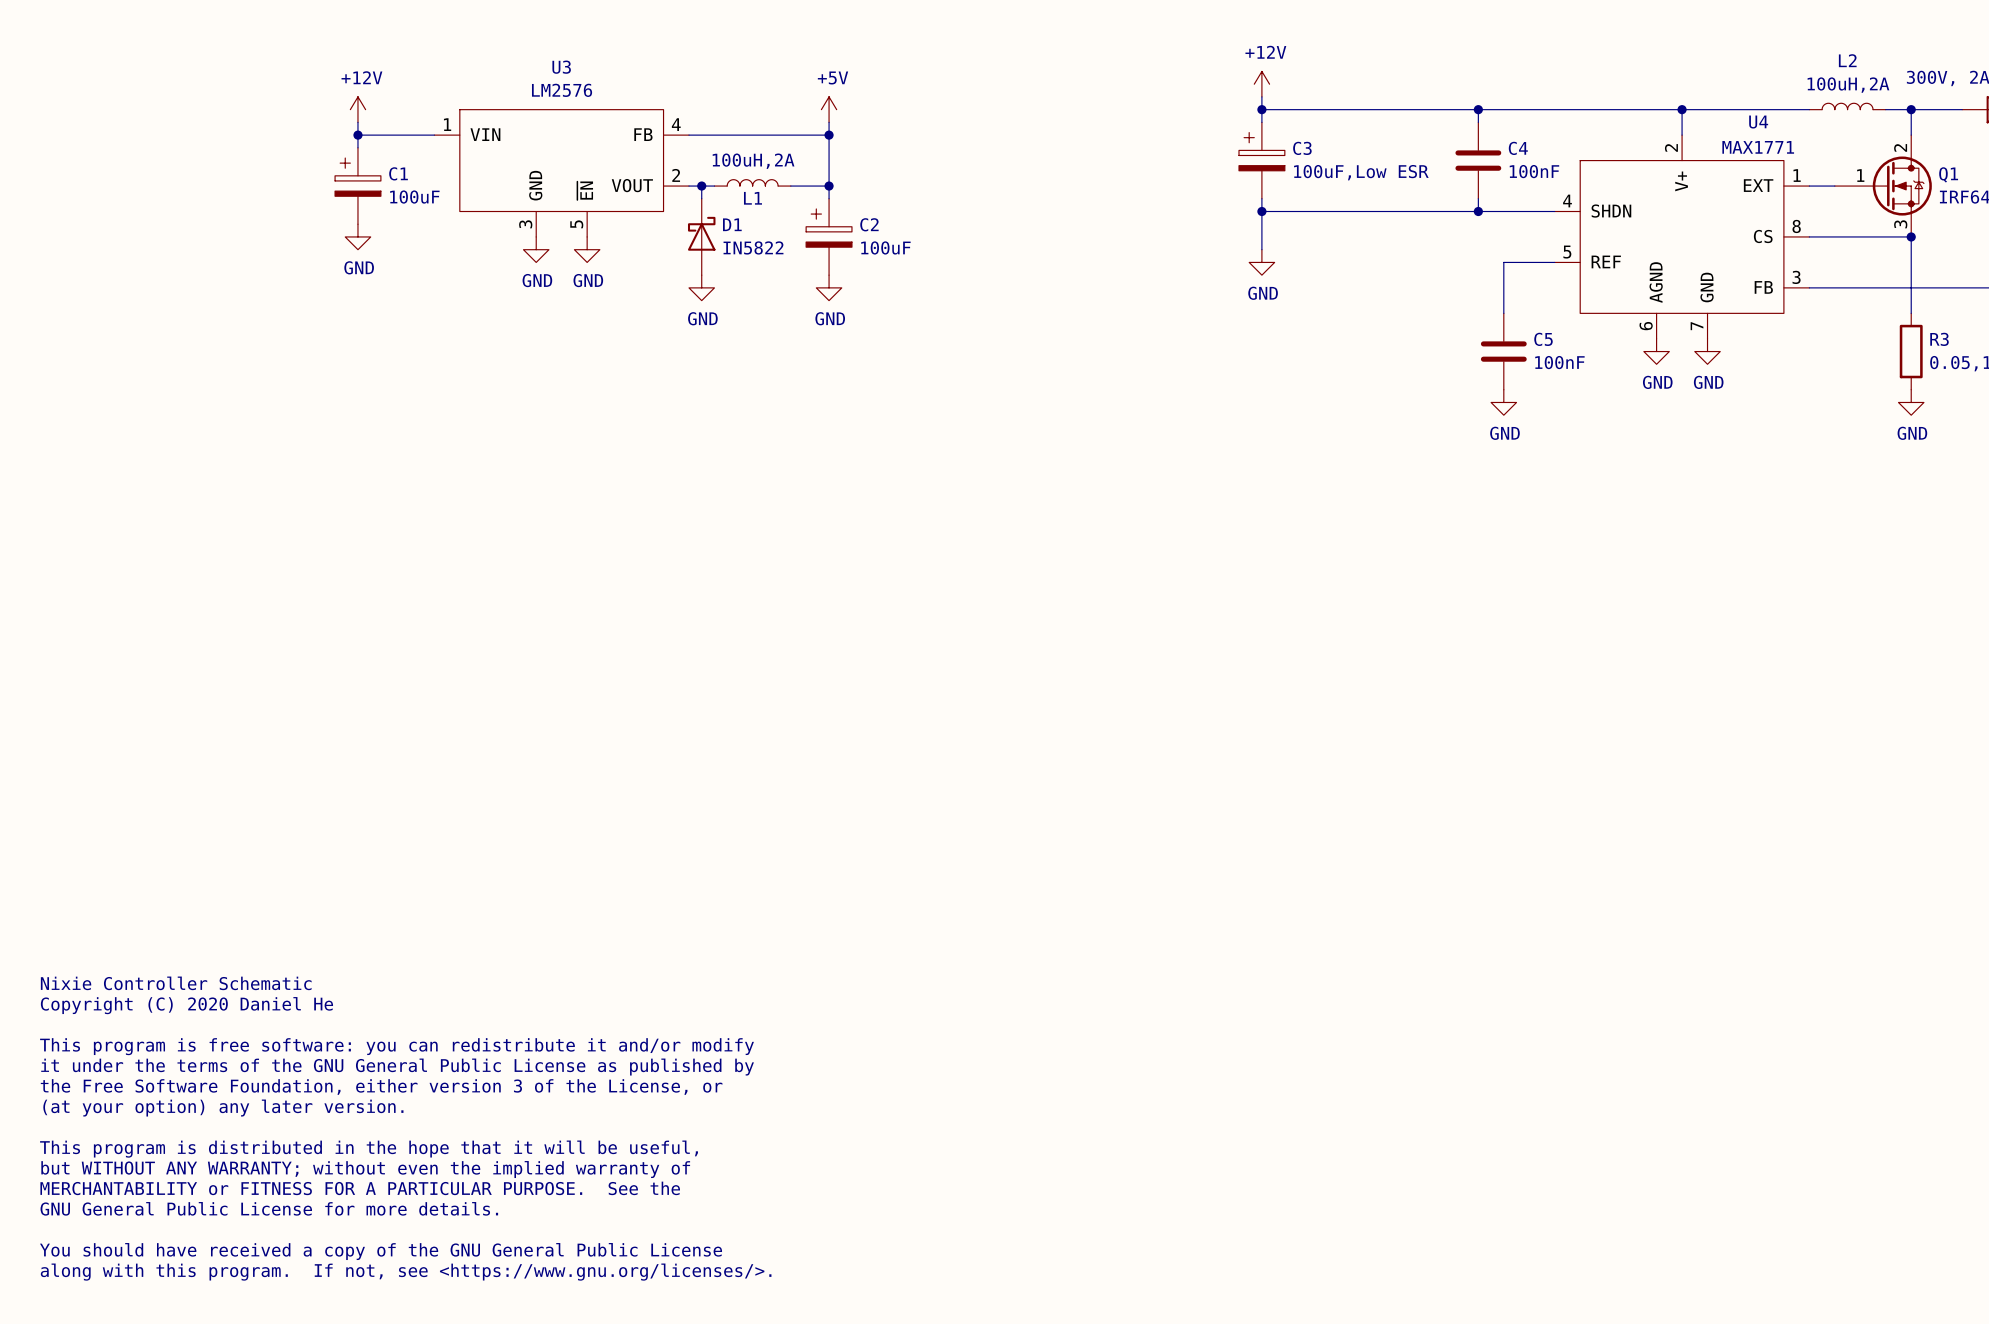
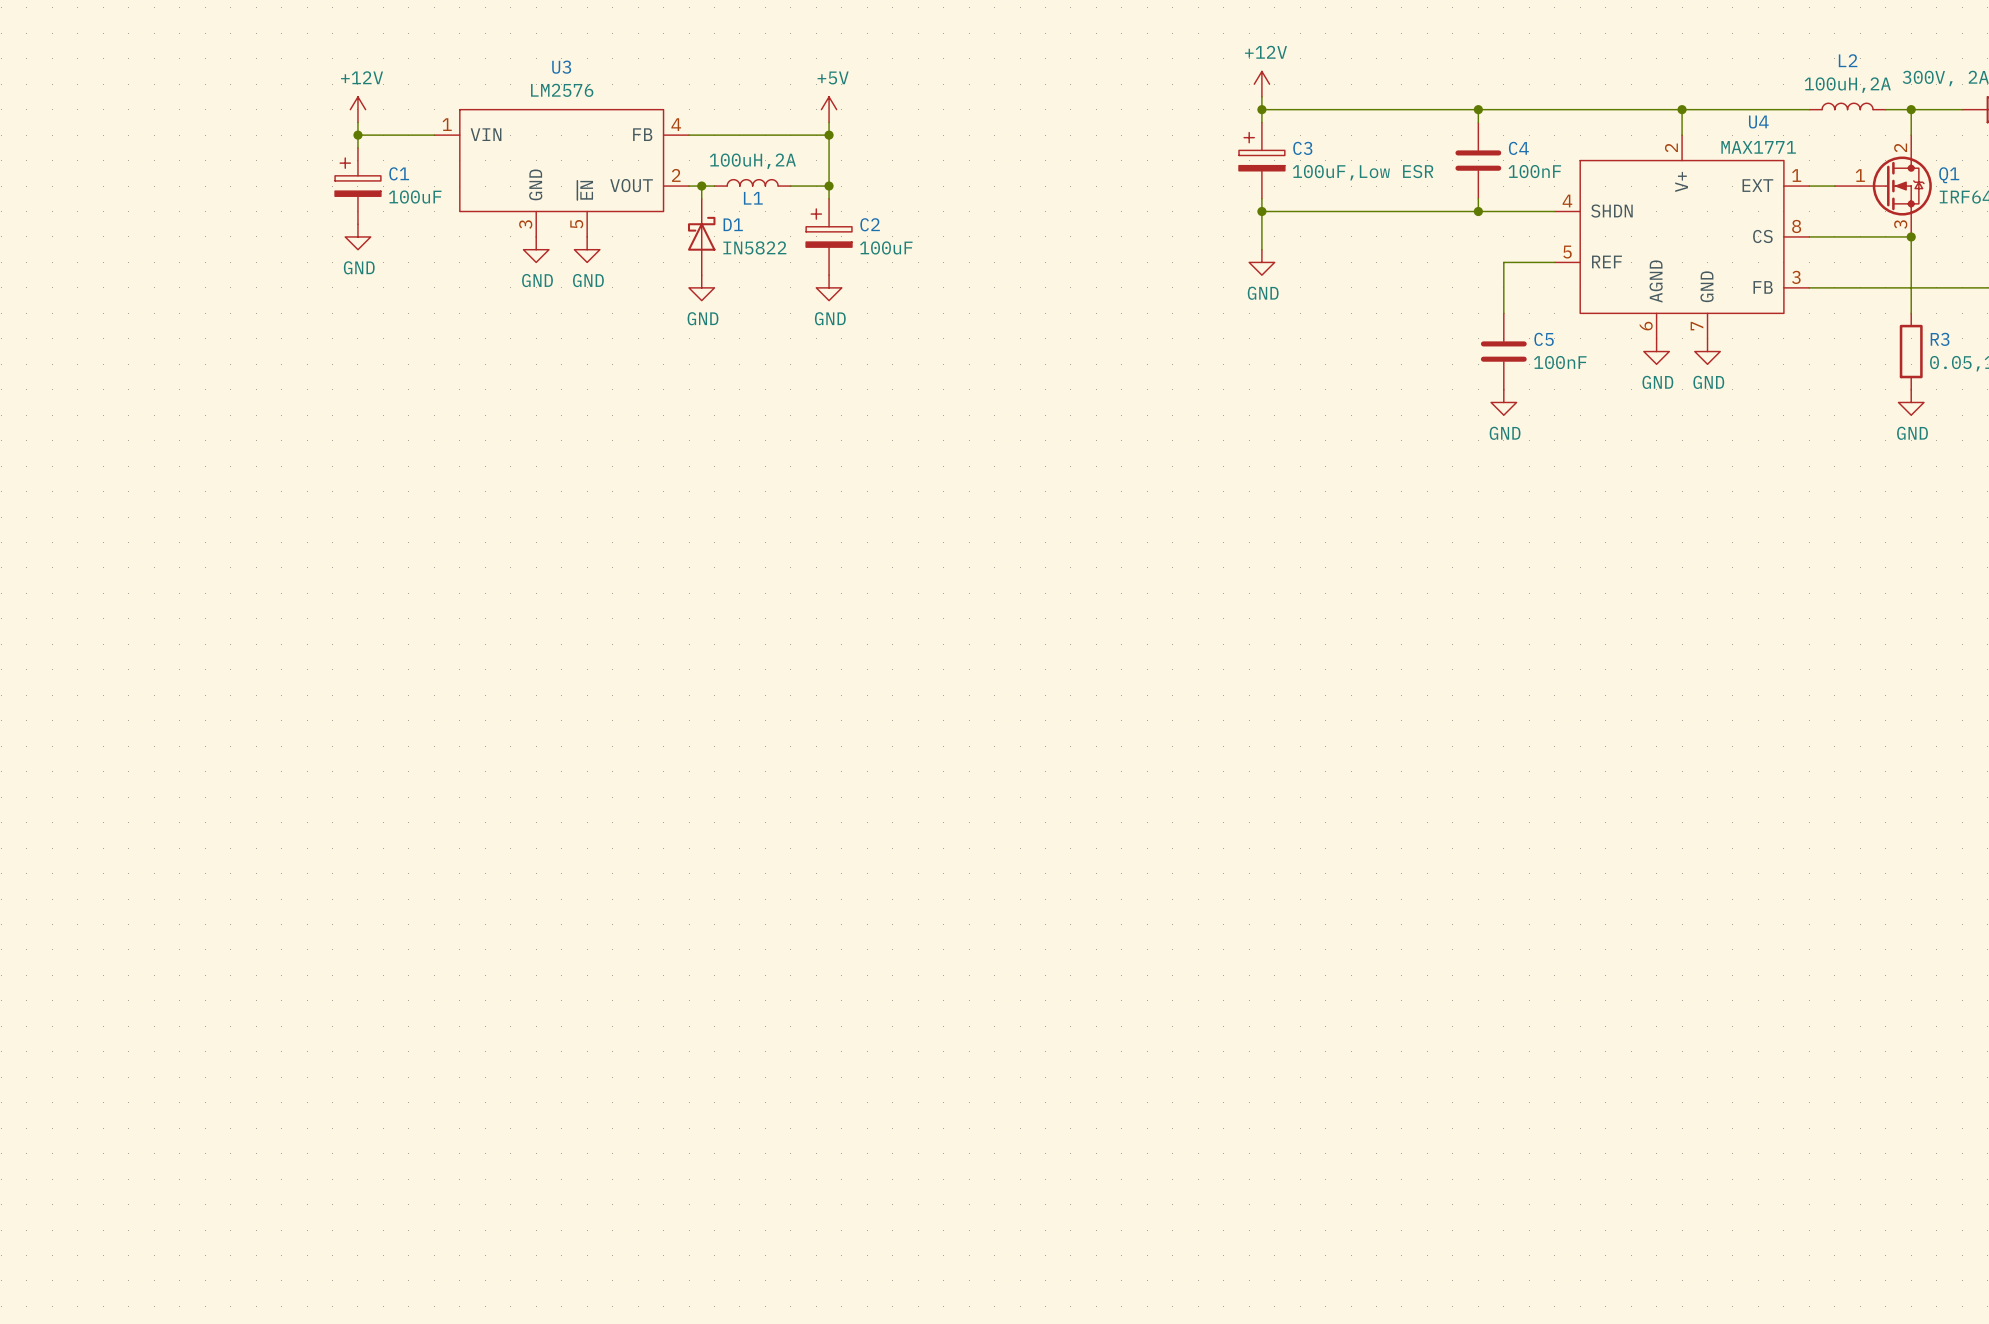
text: Nixie Controller Schematic (176, 983) -> none
text: Copyright (C) 2020 Daniel He (186, 1005) -> none
text: This program is free software: you can redistribute it and/or modify (397, 1046) -> none
text: it under the terms of the GNU General Public License as published by (397, 1067) -> none
text: the Free Software Foundation, either version 3 of the License, or (381, 1086) -> none
text: (at your option) any later version. (223, 1108) -> none
text: This program is distributed in the hope that it will be useful, (369, 1149) -> none
text: but WITHOUT ANY WARRANTY; without even the implied warranty of (365, 1169) -> none
text: MERCHANTABILITY or FITNESS FOR A PARTICULAR PURPOSE. See the (360, 1188) -> none
text: GNU General Public License for more details. (269, 1208) -> none
text: You should have received a copy of the GNU General Public License (381, 1251) -> none
text: along with this program. If not, see <https://www.gnu.org/licenses/>. (406, 1272) -> none

